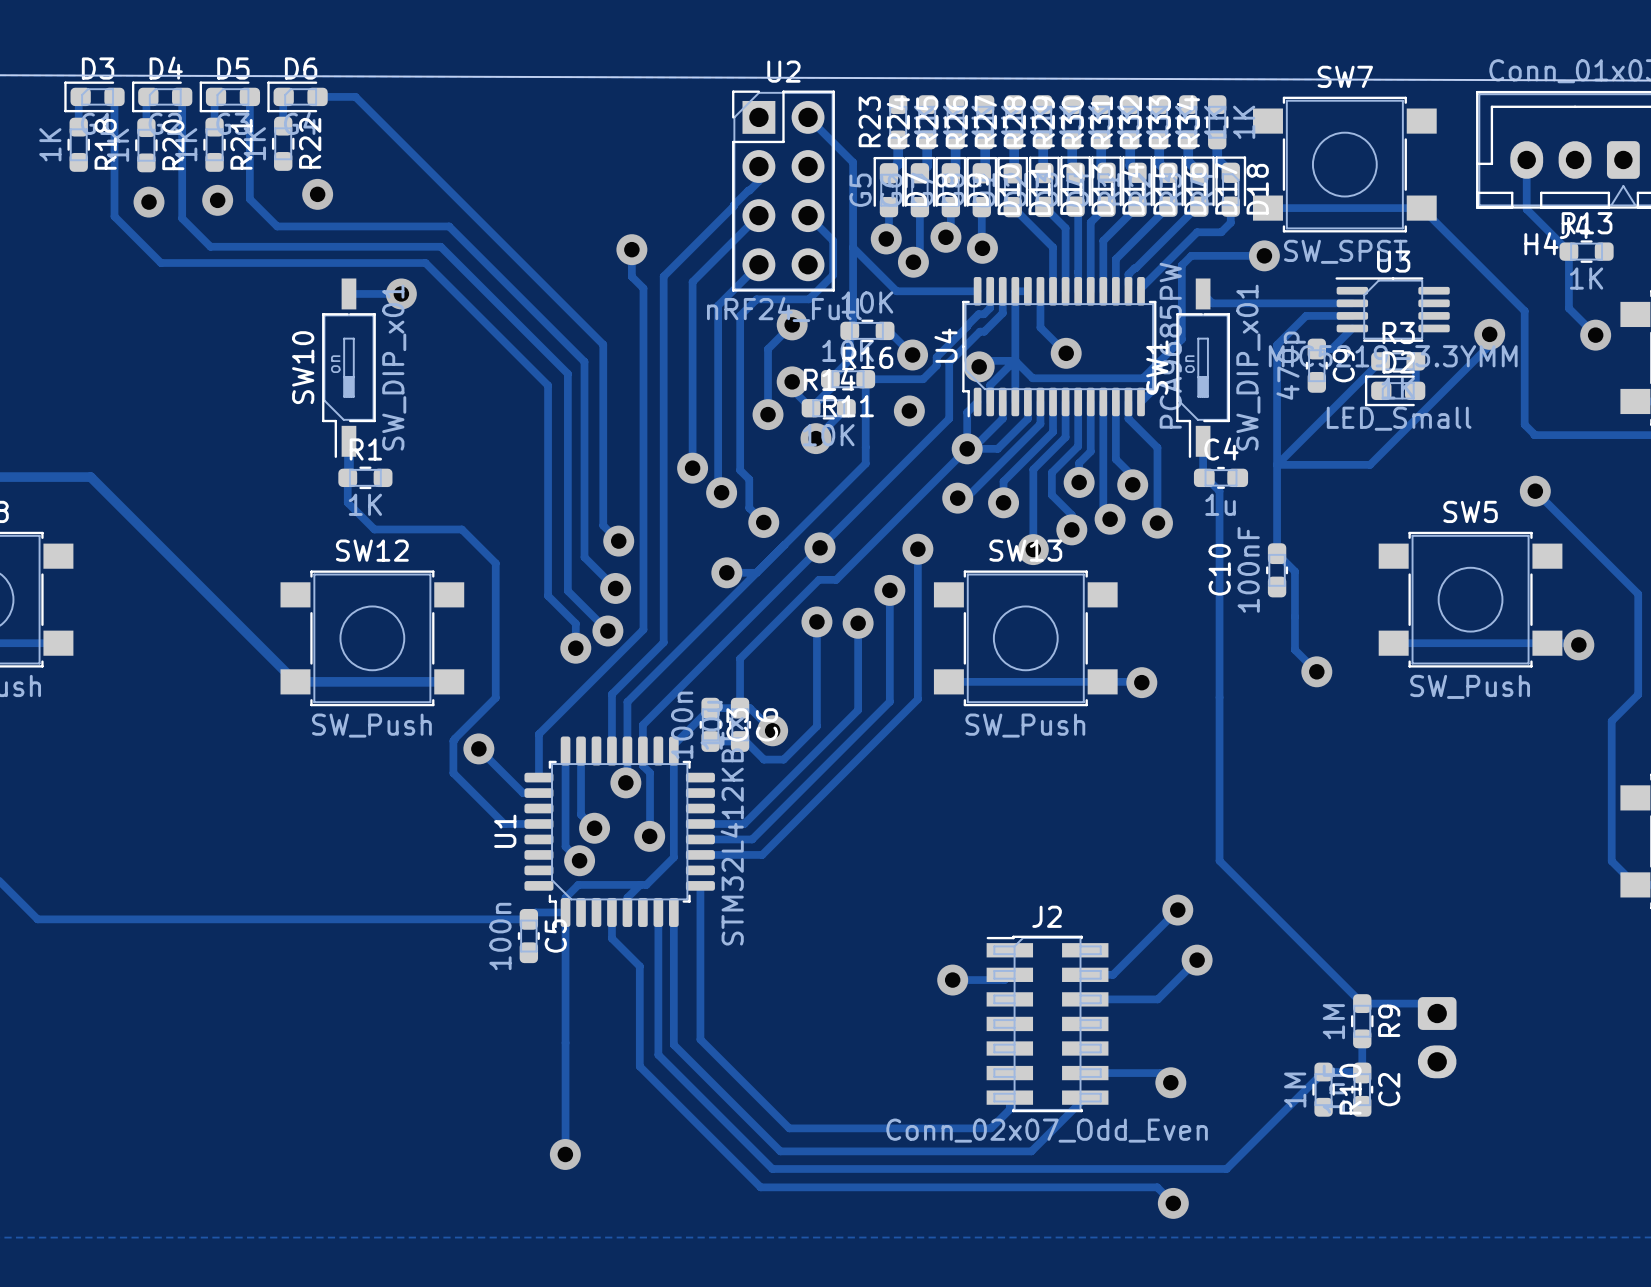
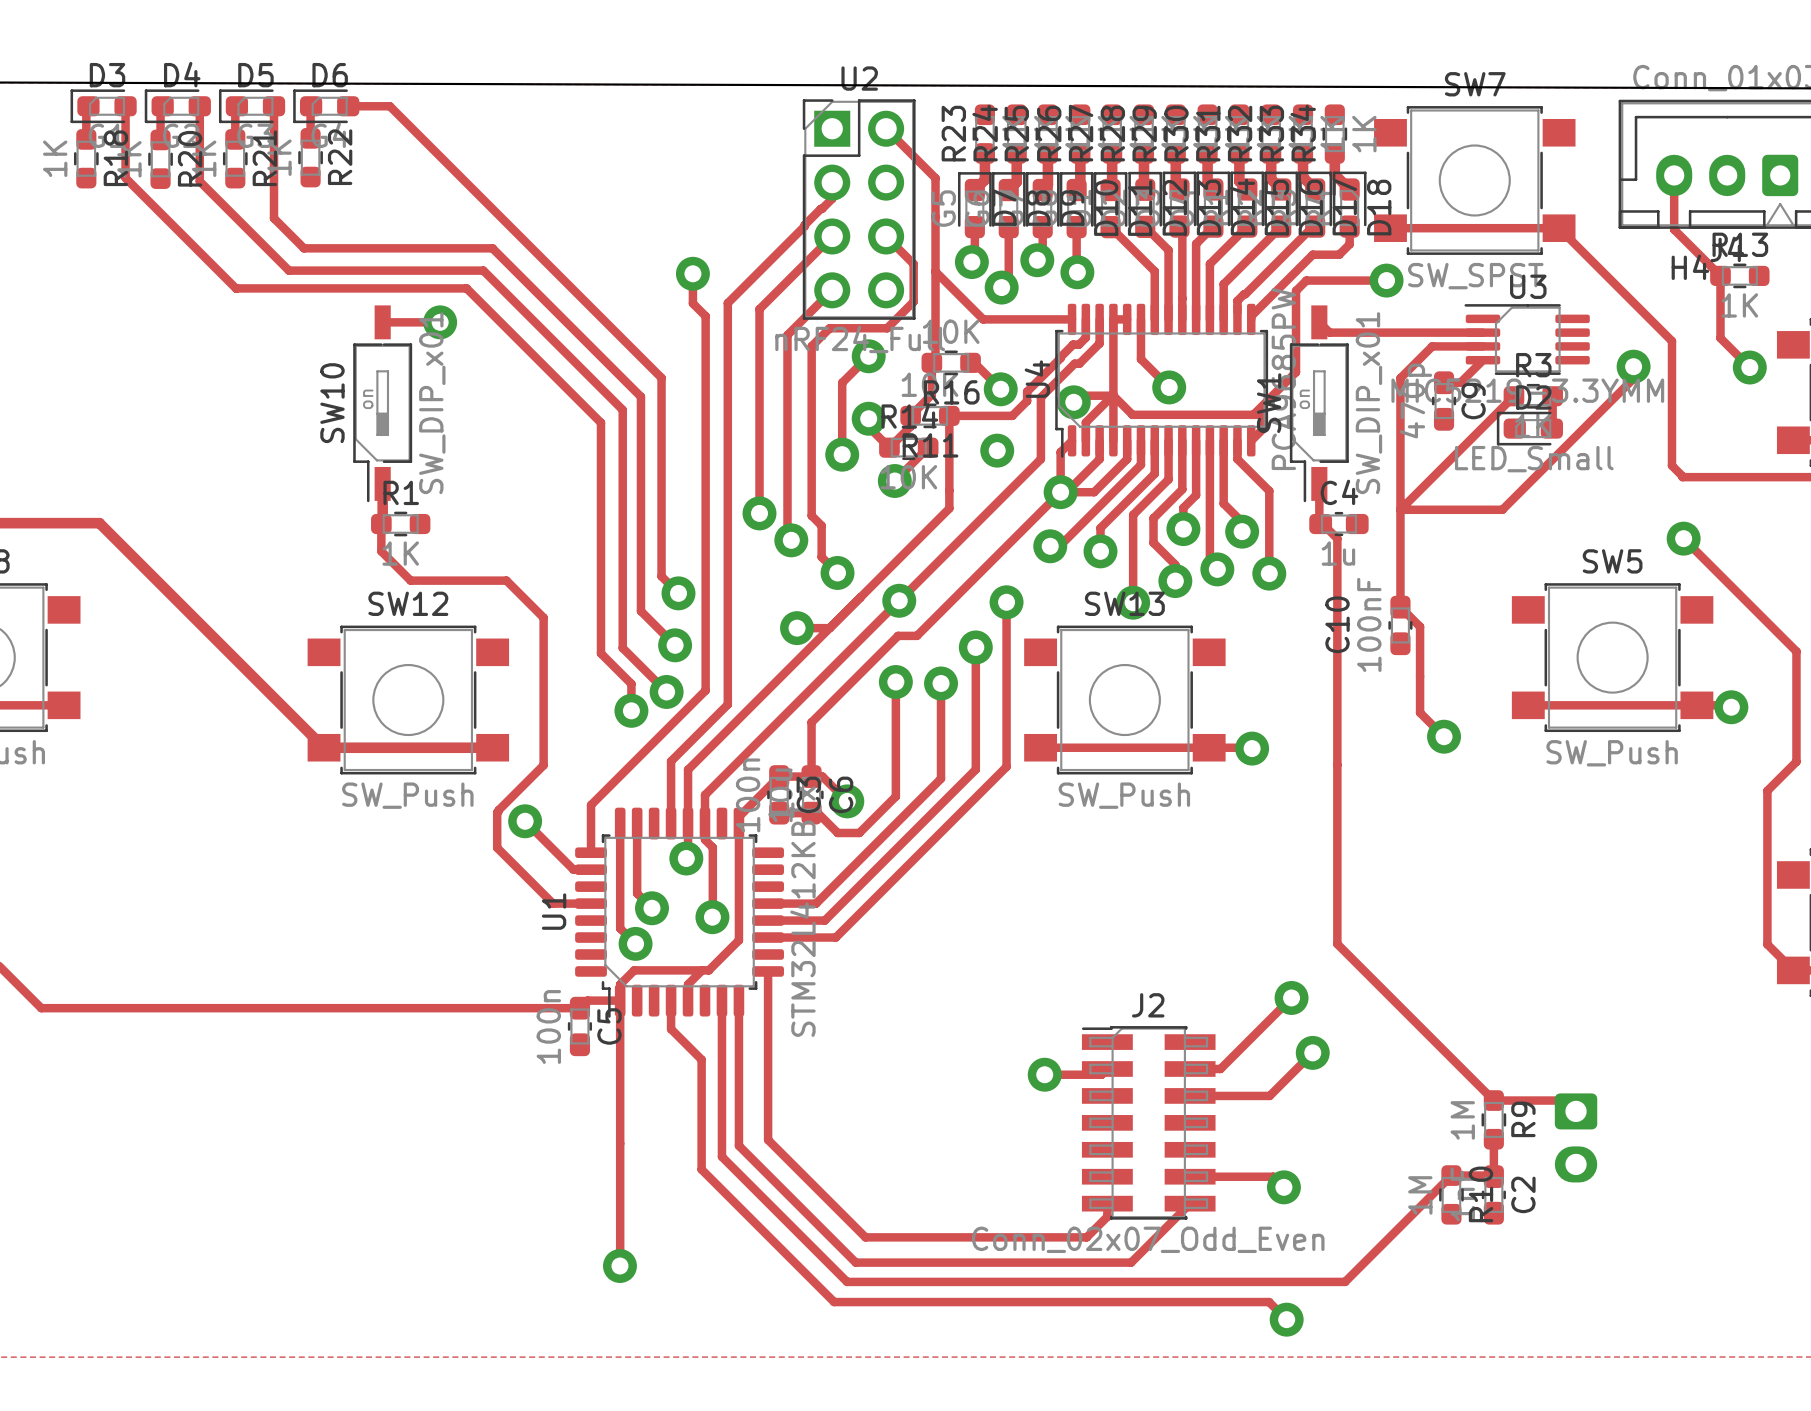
track: (114, 162) (114, 216) (161, 263) (215, 263) -> (125, 178) (236, 288)
track: (182, 165) (182, 218) (210, 246) (263, 246) -> (199, 181) (288, 270)
via: (317, 194) -> none
via: (217, 200) -> none
via: (149, 202) -> none

